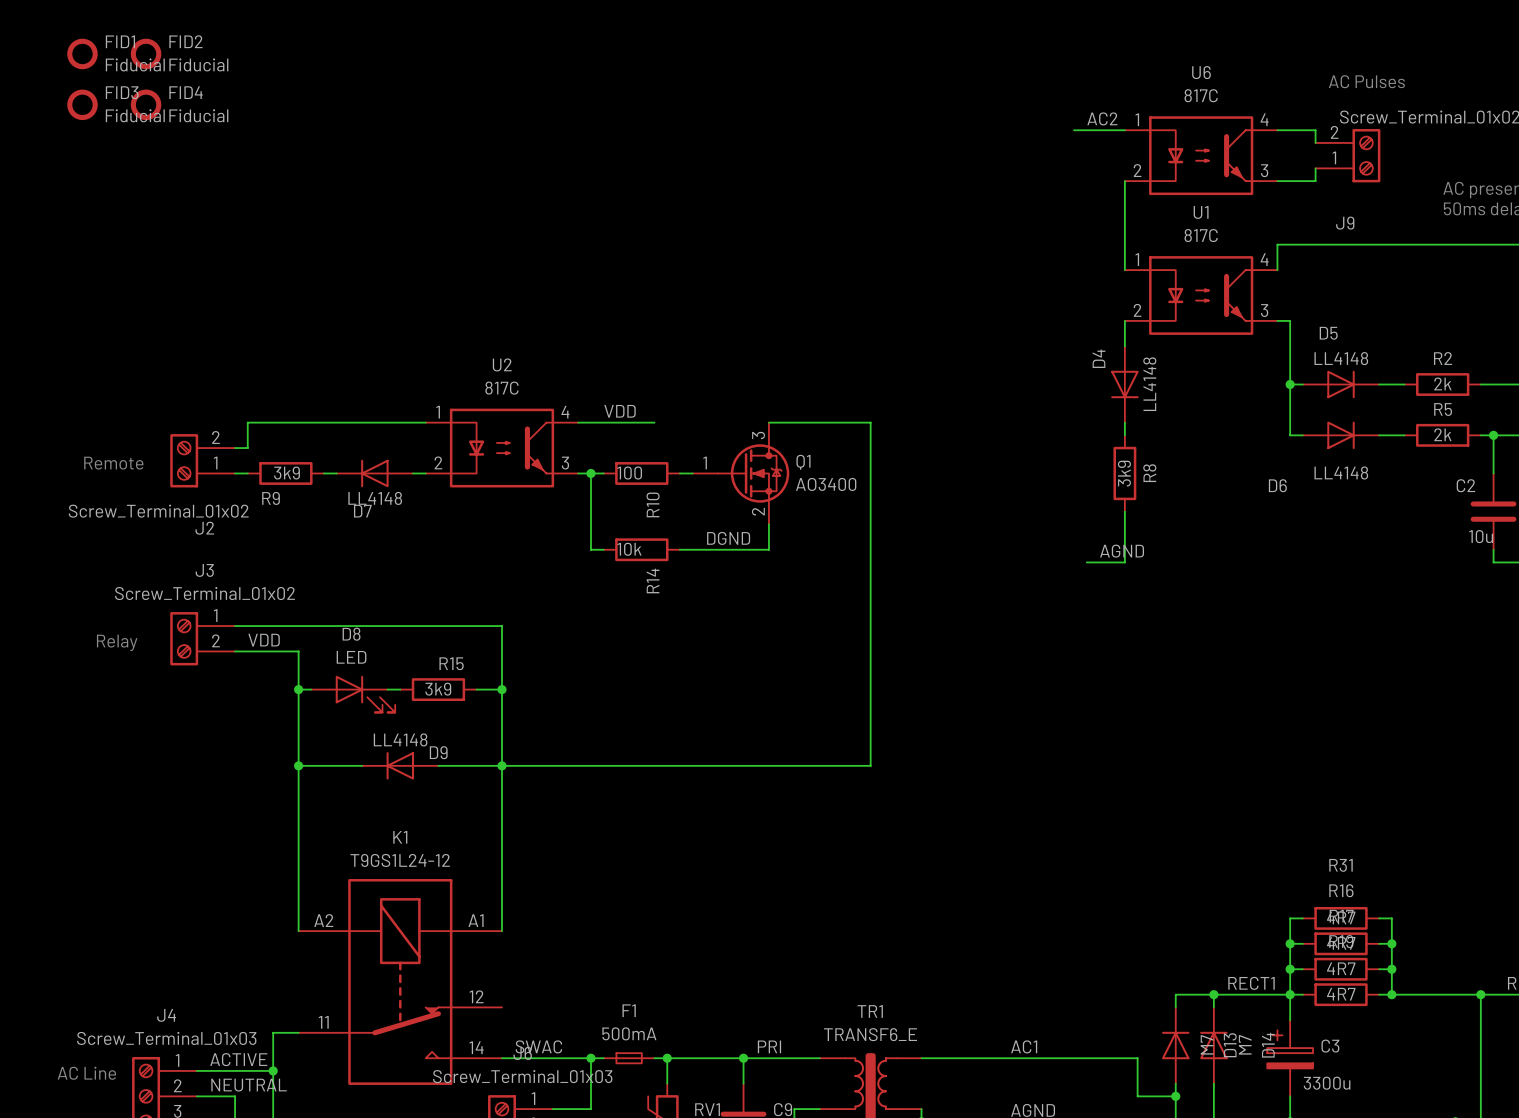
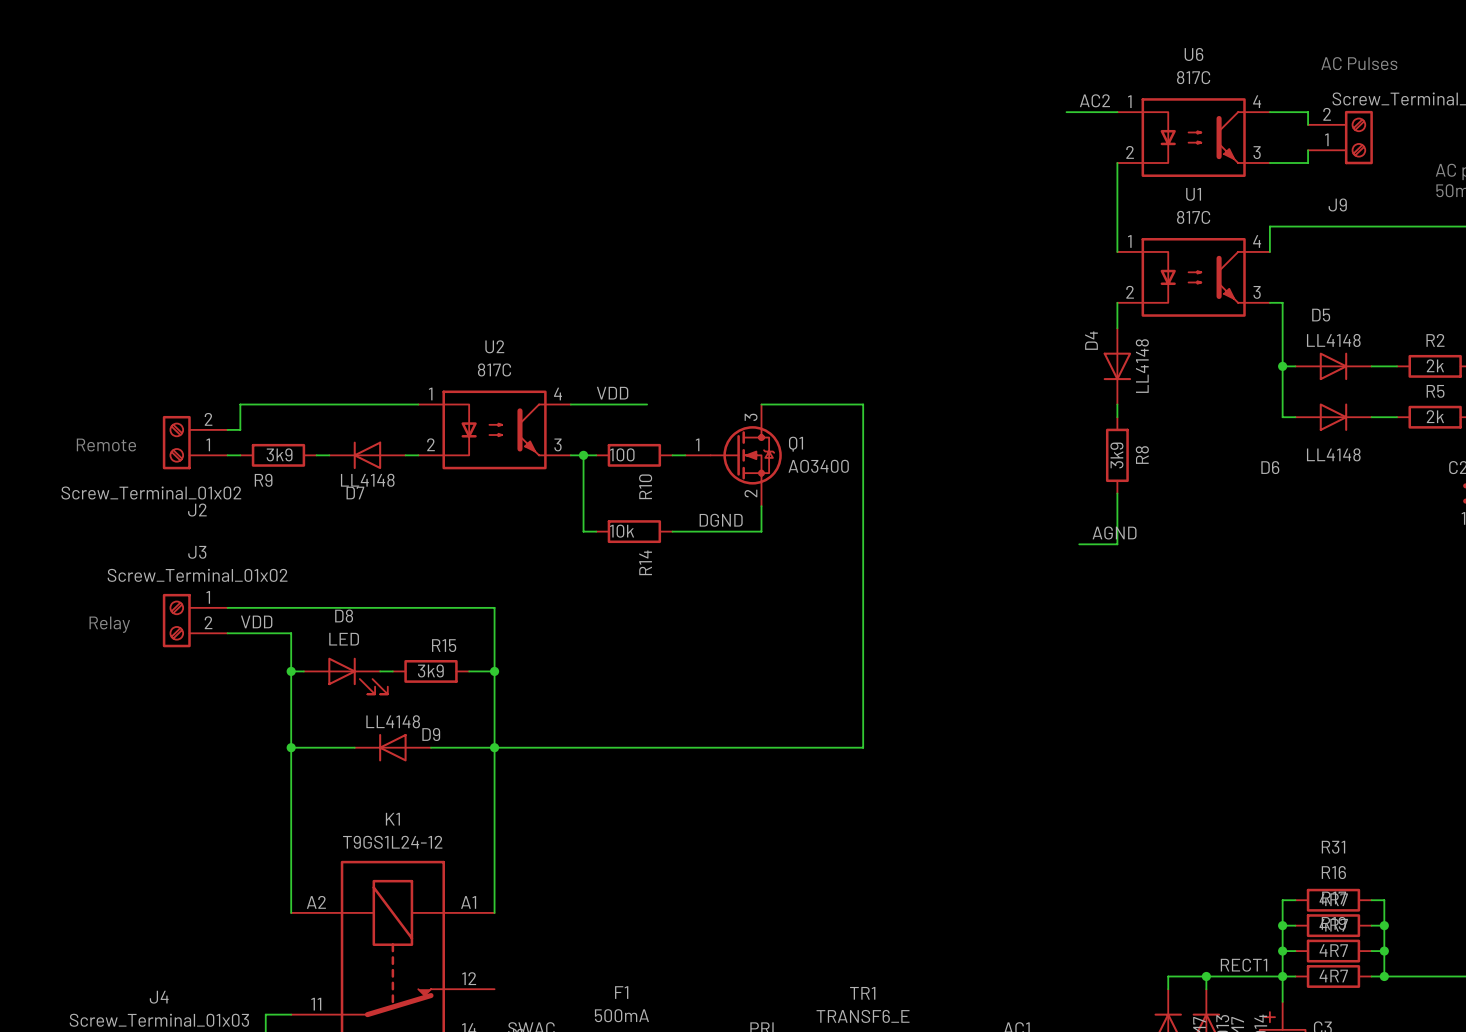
FID1: Fiducial (82, 53) -> none
FID2: Fiducial (146, 53) -> none
FID3: Fiducial (82, 104) -> none
FID4: Fiducial (146, 104) -> none

